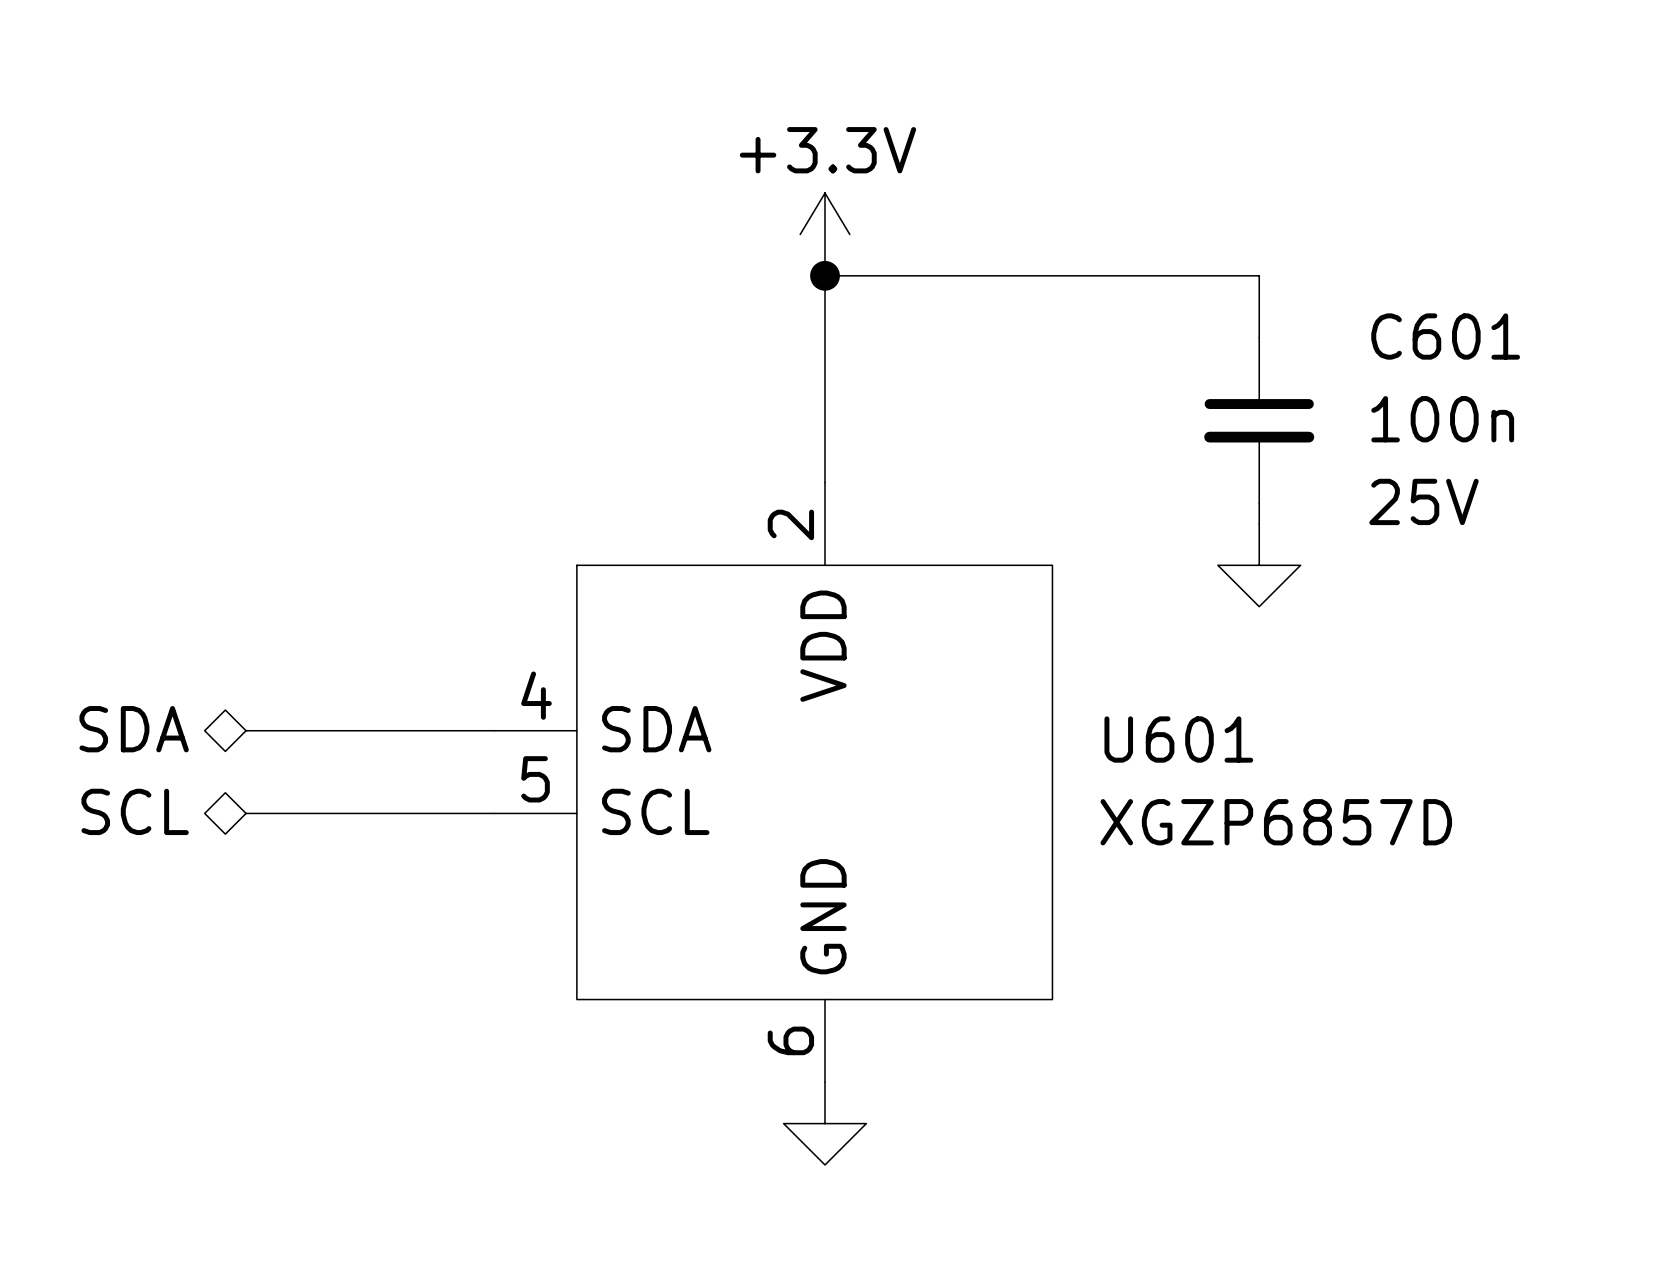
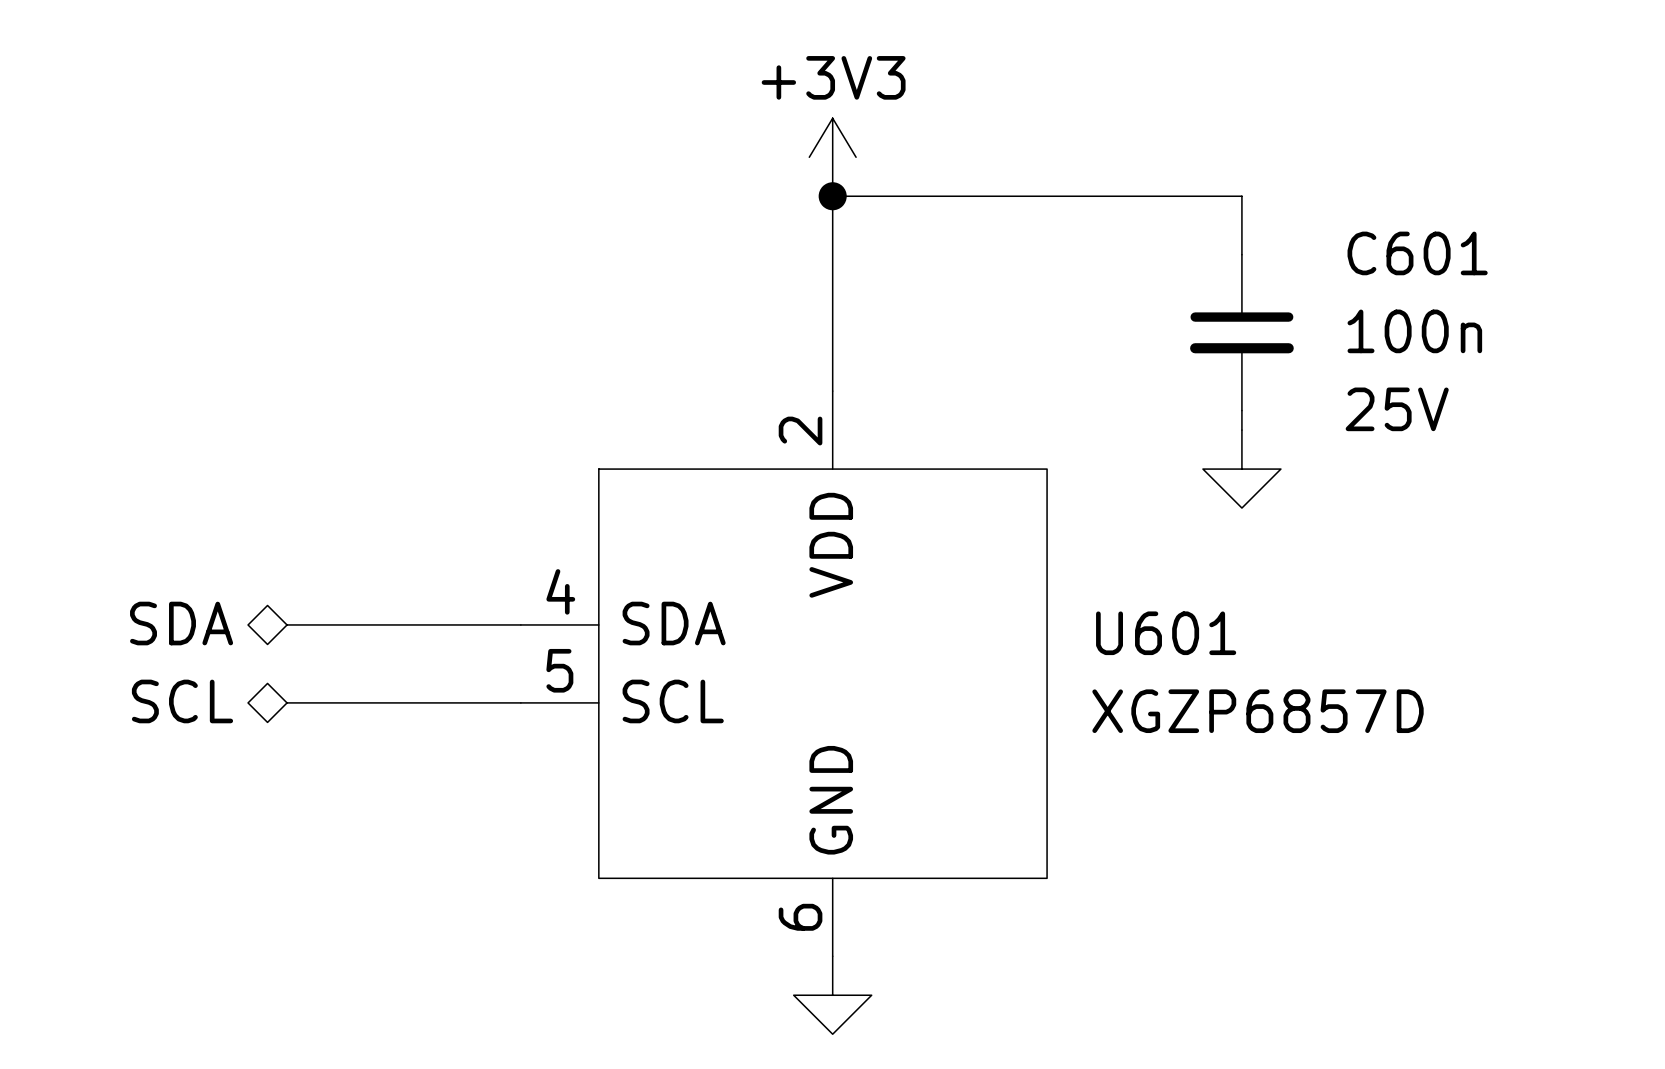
power symbol: +3.3V (825, 234) -> +3V3 (832, 157)

